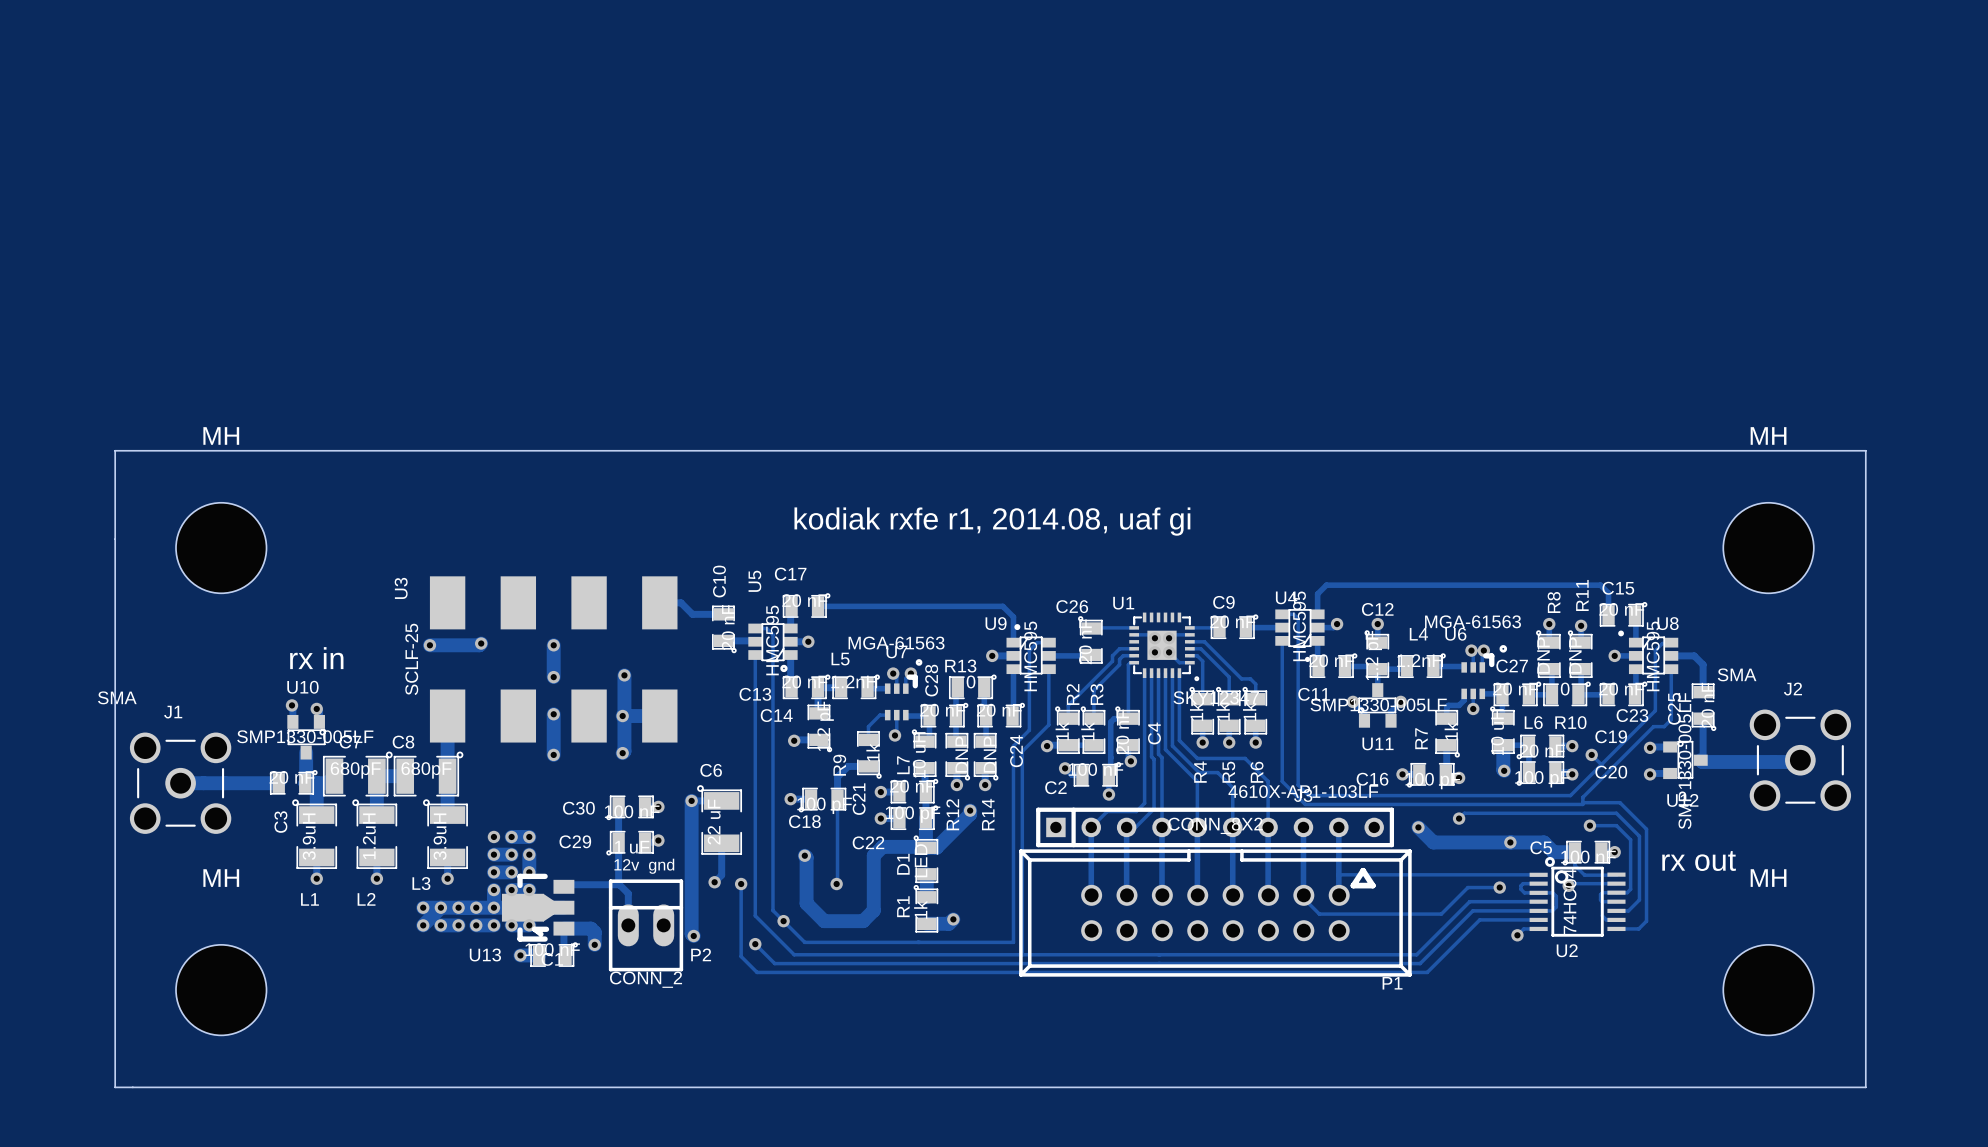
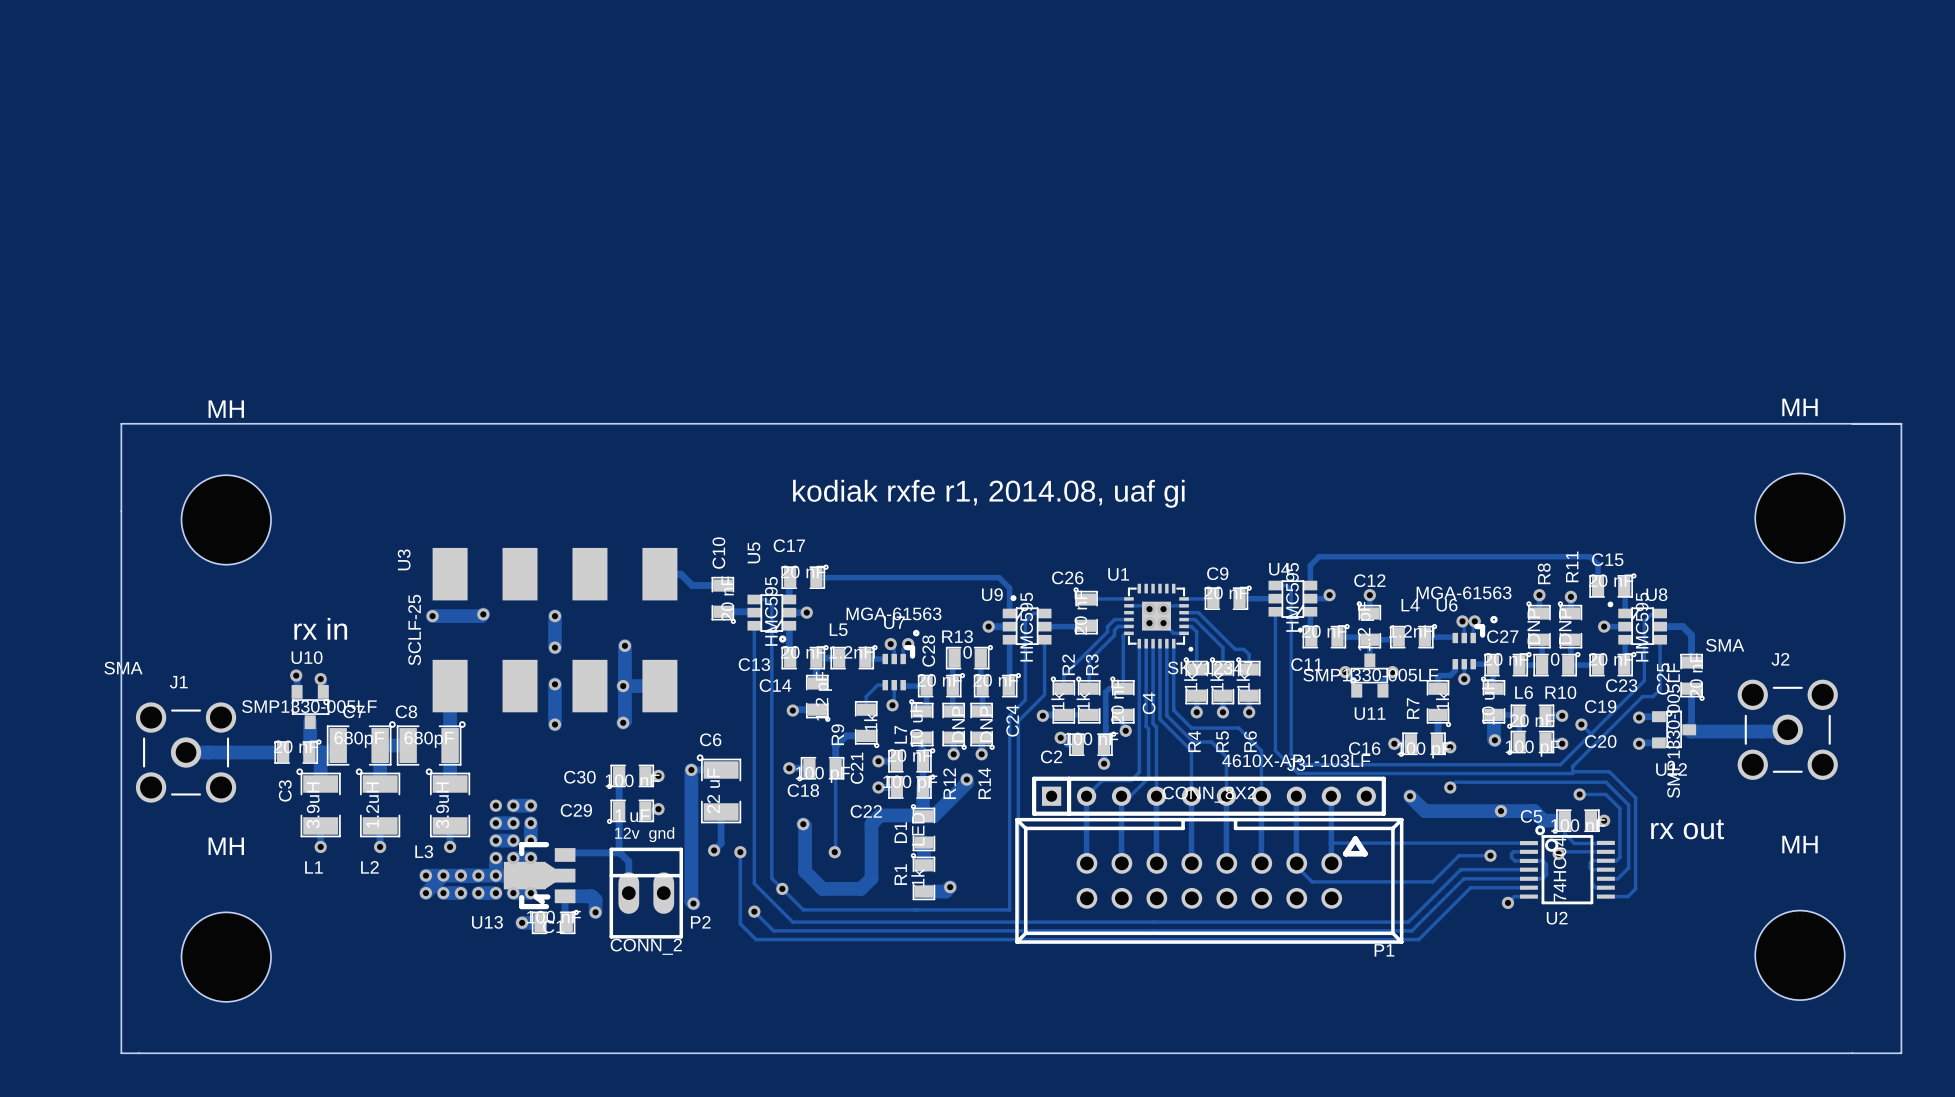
board edge: (1865, 450) (1865, 1087) -> (1852, 423) (1901, 423) (1901, 1053) (1852, 1053)
MH position: (1768, 548) -> (1799, 518)
MH position: (1768, 990) -> (1799, 955)

